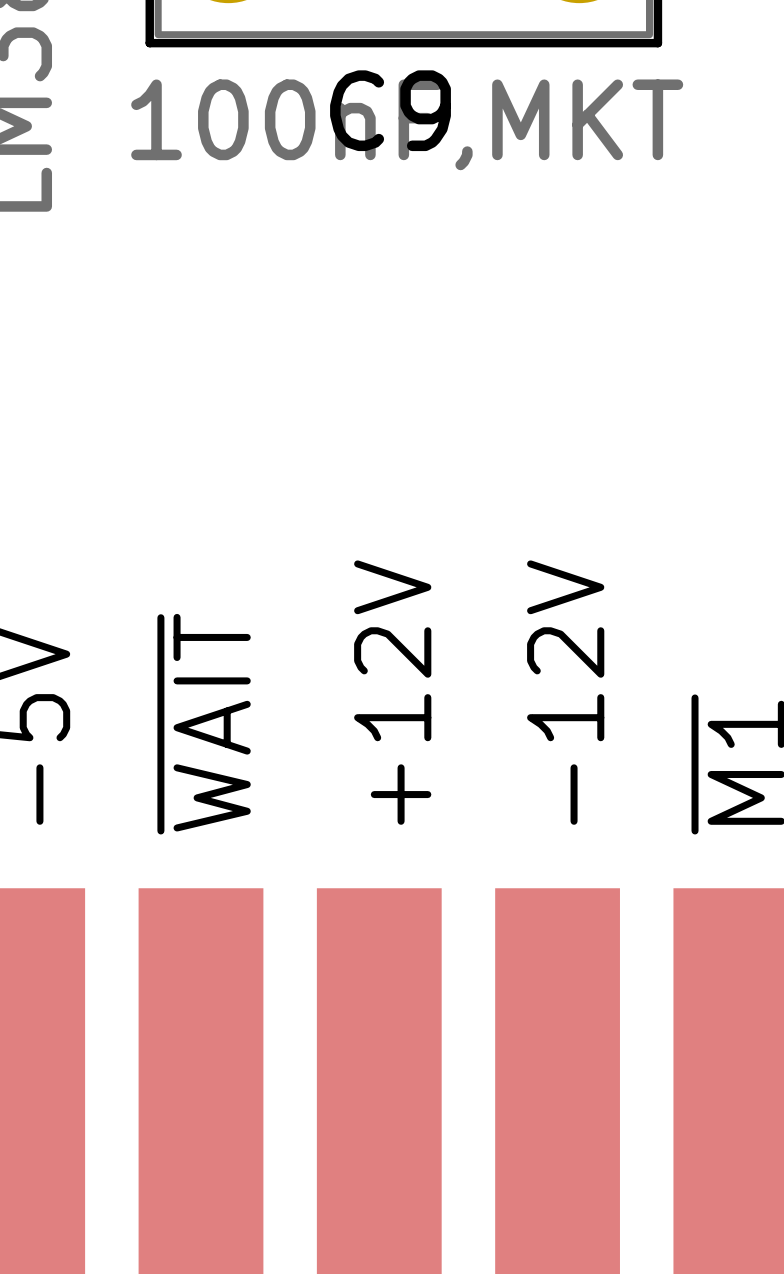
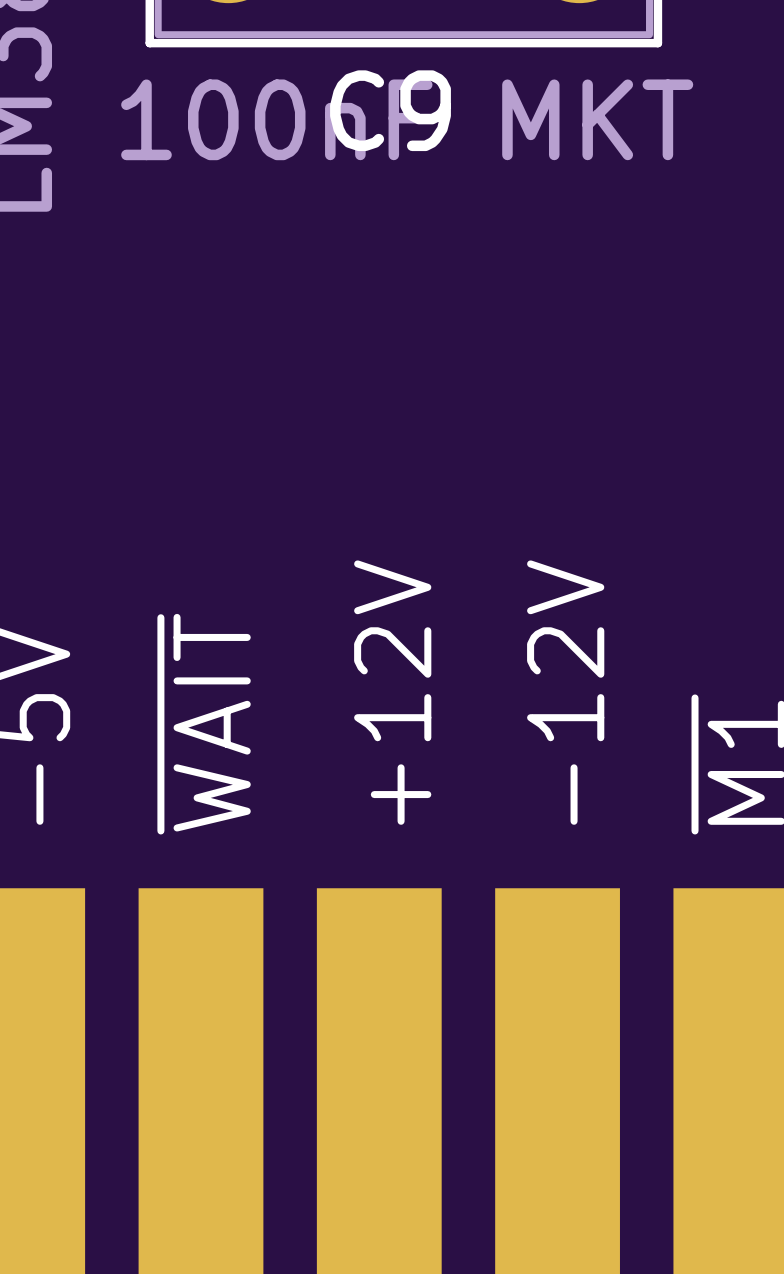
C9 value: 100nF,MKT (407, 124) -> 100nF MKT (407, 119)

